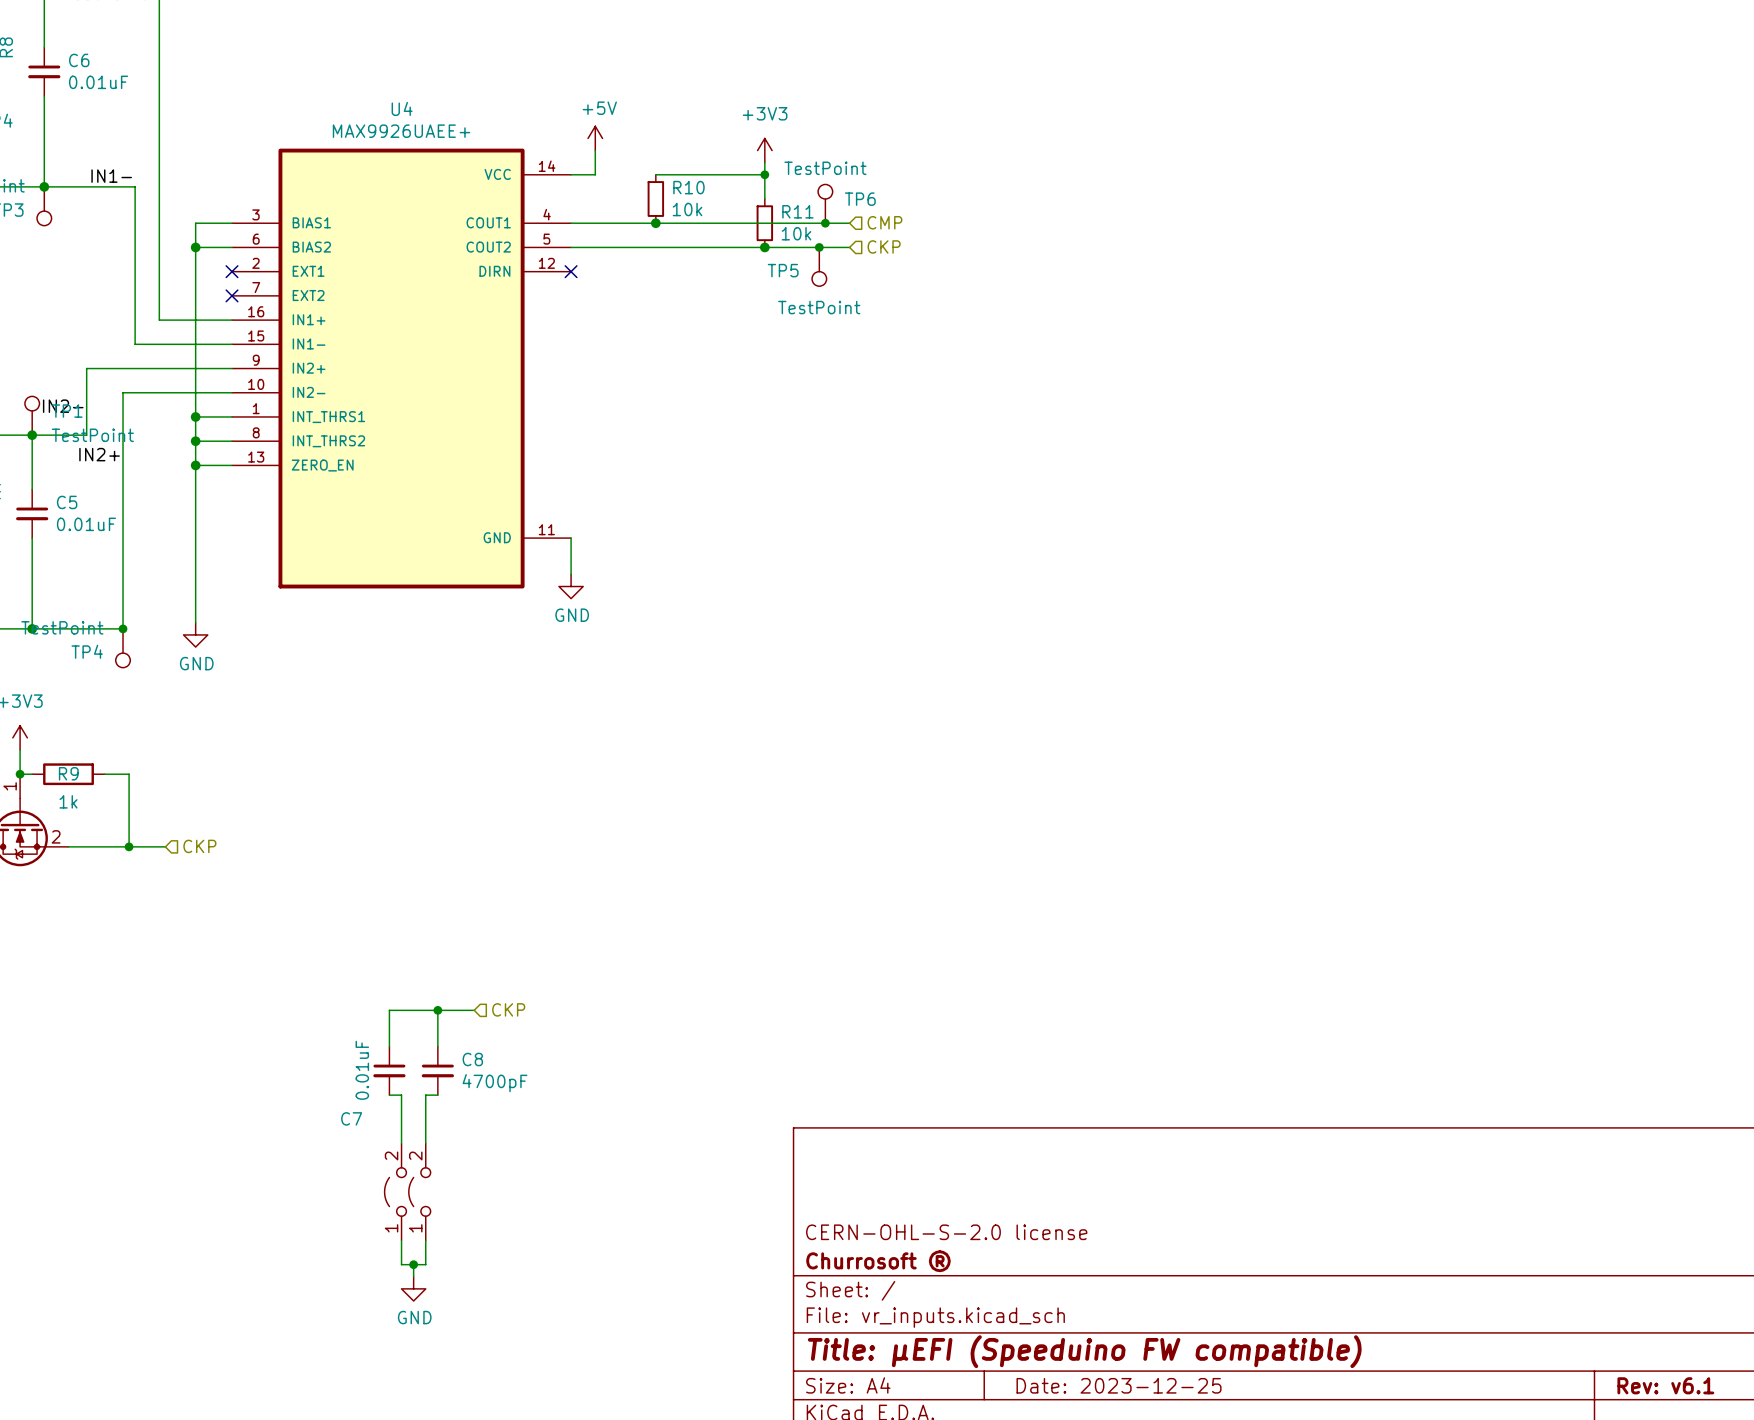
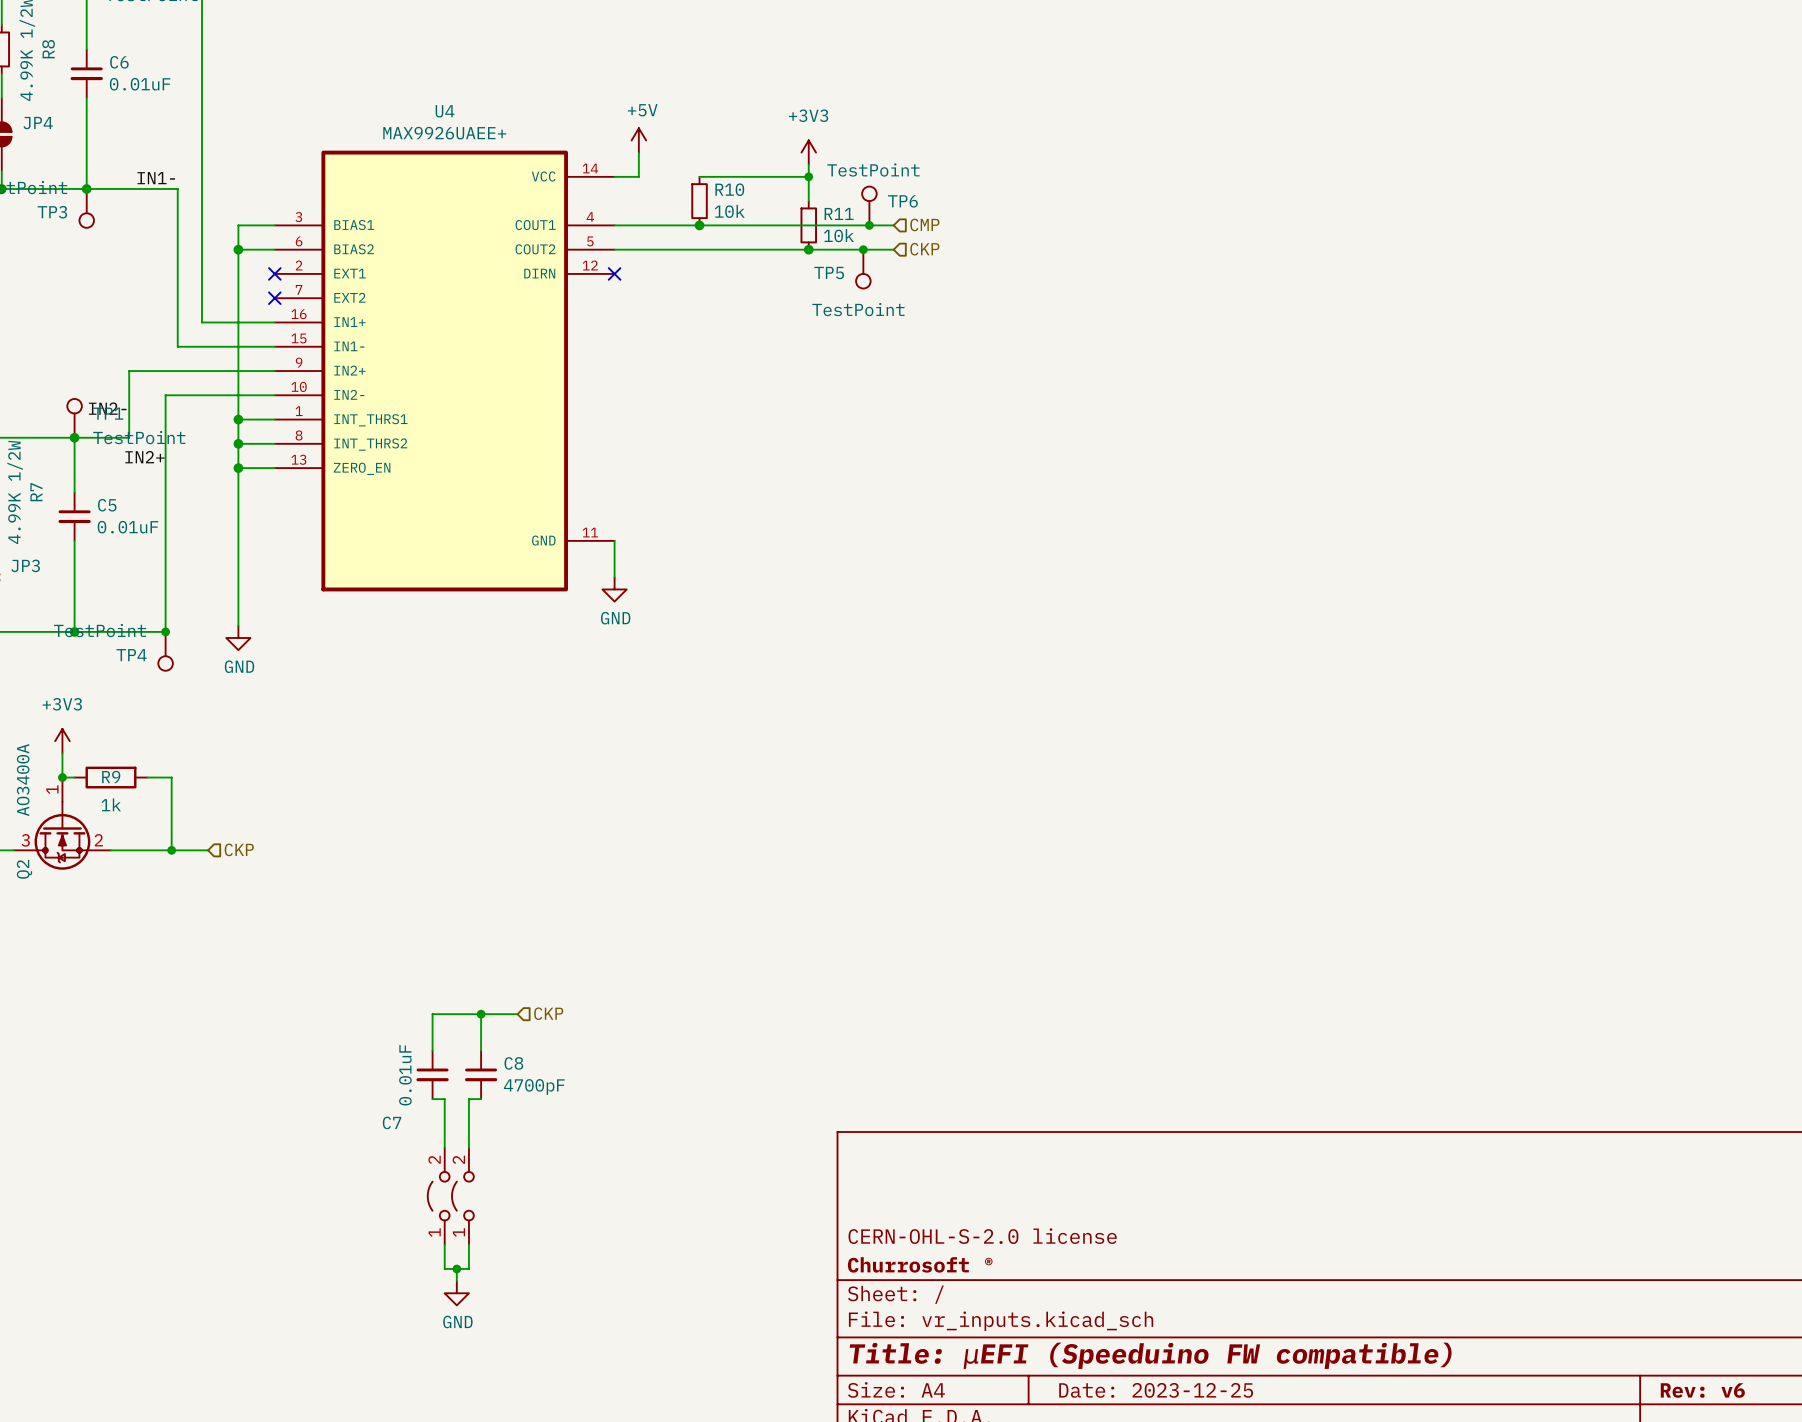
title block: Rev: v6.1 (1665, 1385) -> Rev: v6 (1702, 1390)

